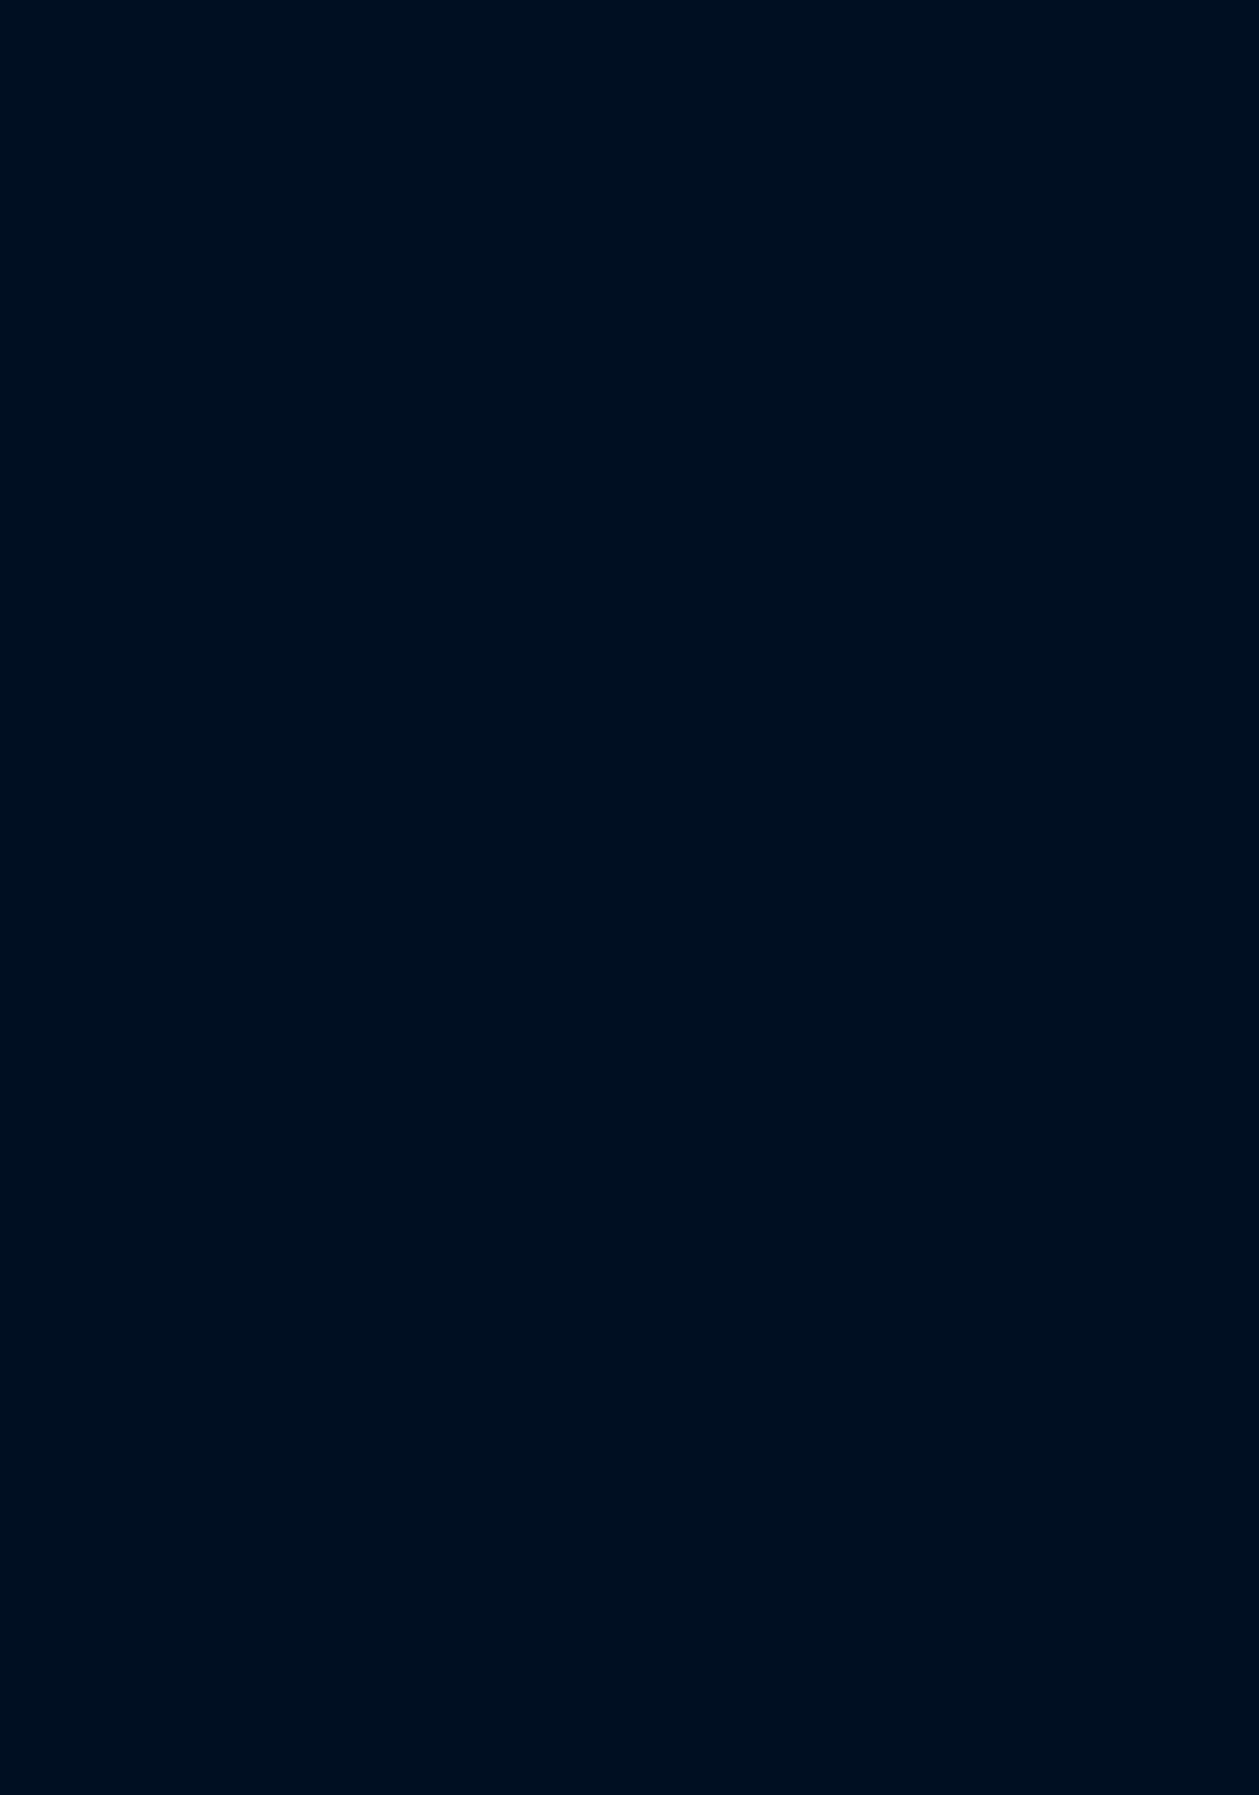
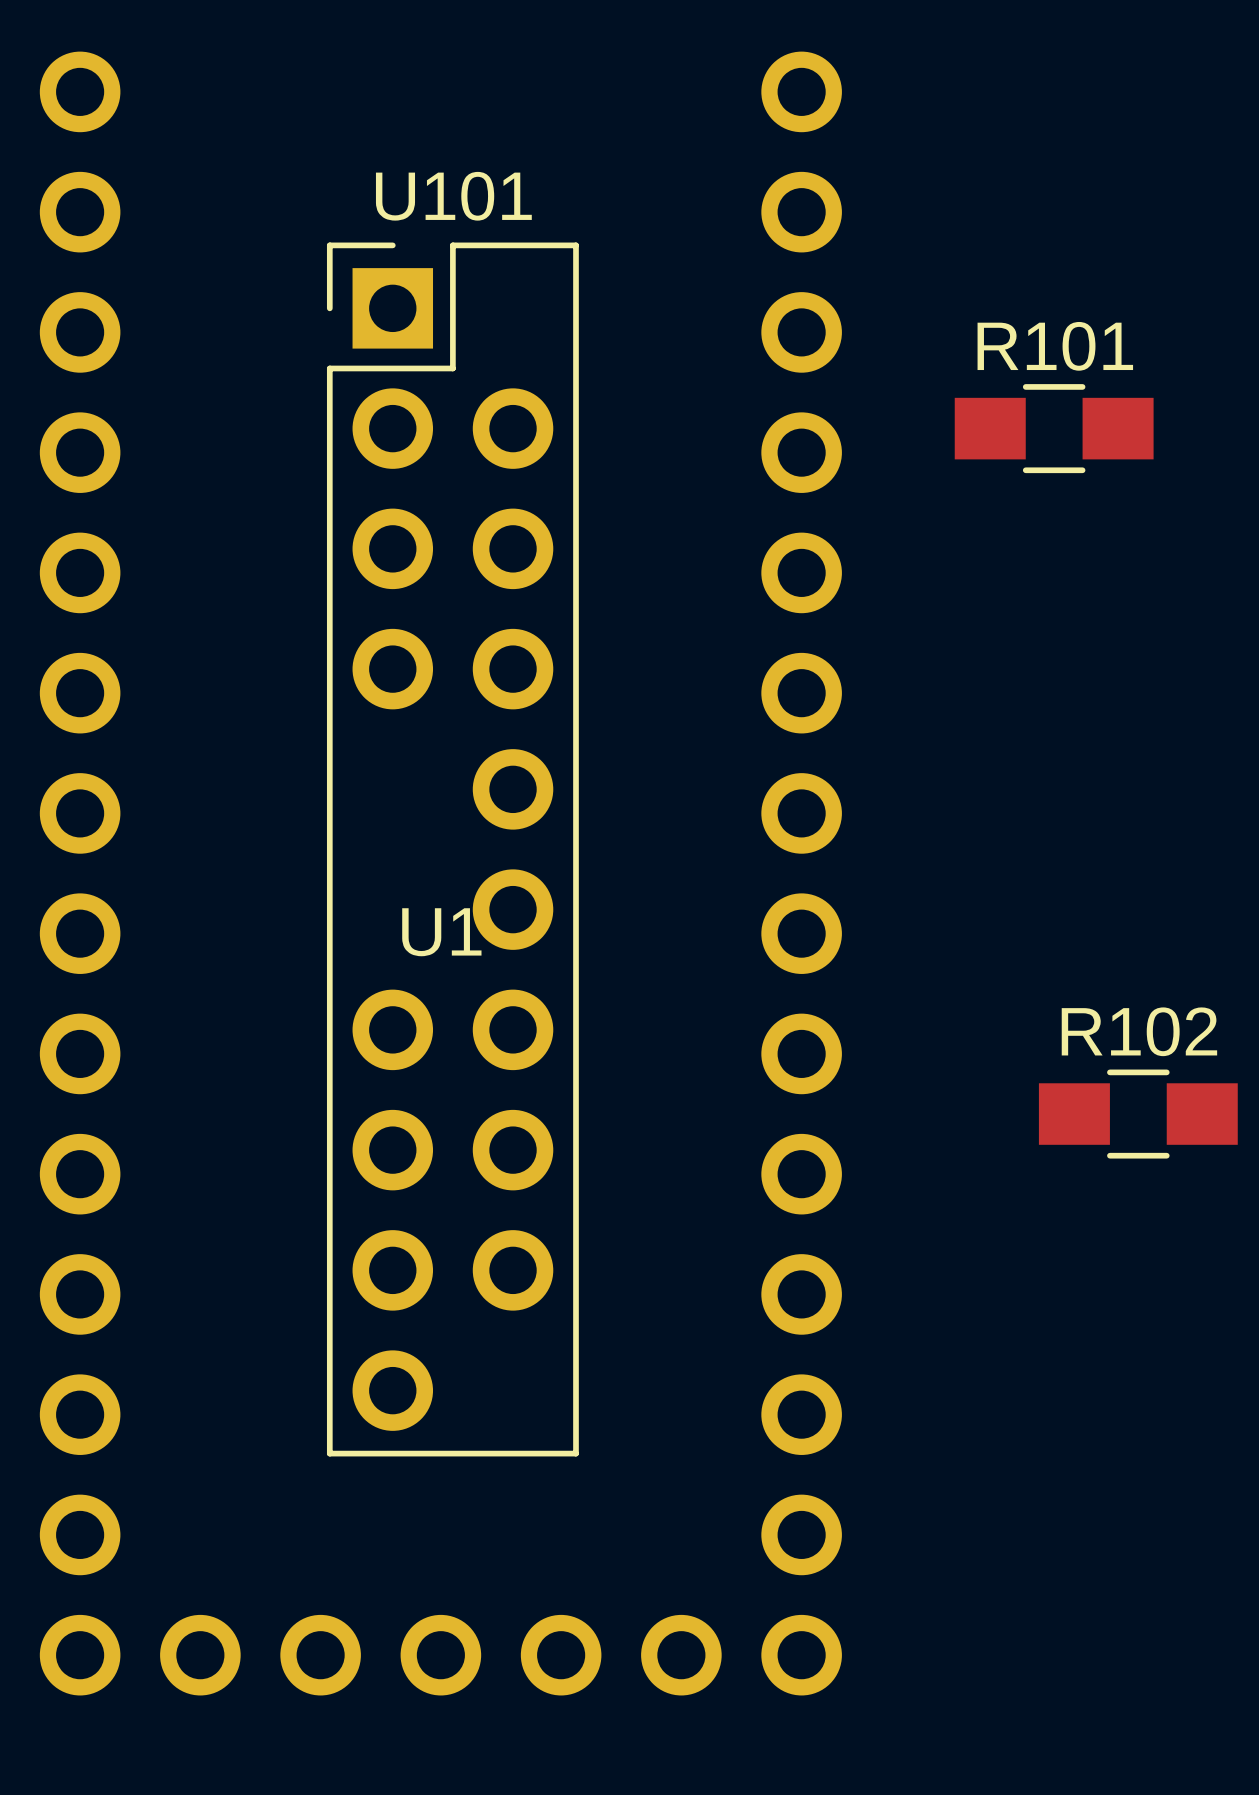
R101: none -> (1054, 428)
U101: none -> (452, 849)
U1: none -> (440, 873)
R102: none -> (1138, 1114)

